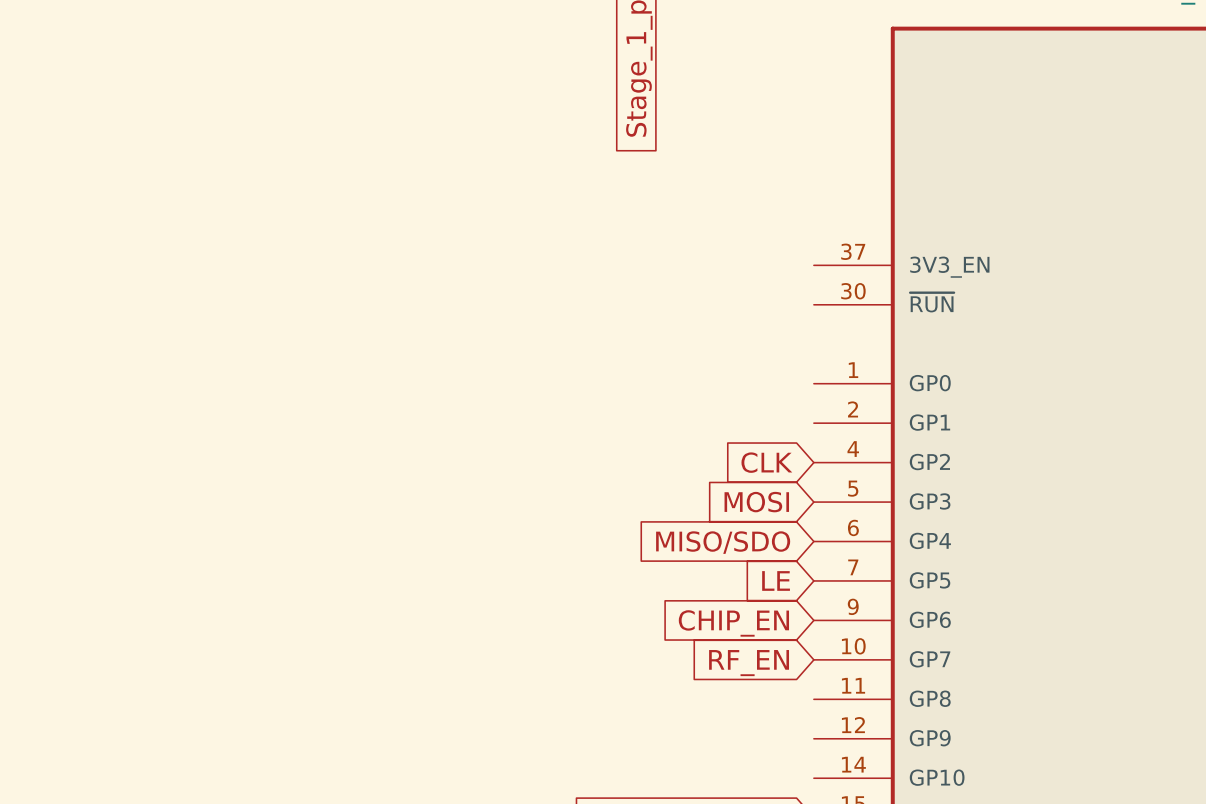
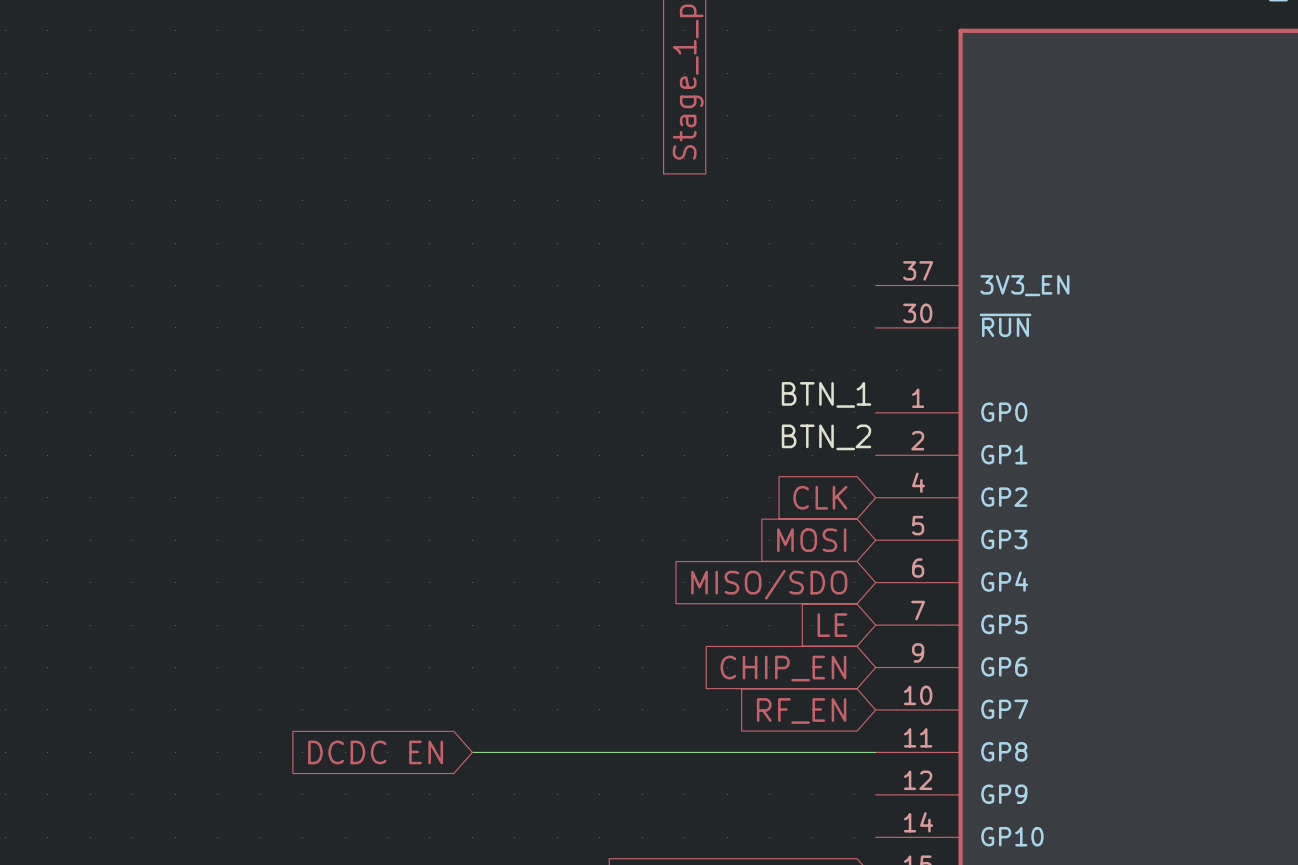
label: none -> BTN_1 (826, 394)
label: none -> BTN_2 (826, 437)
global label: none -> DCDC EN (375, 752)
wire: none -> (472, 752) (875, 752)

